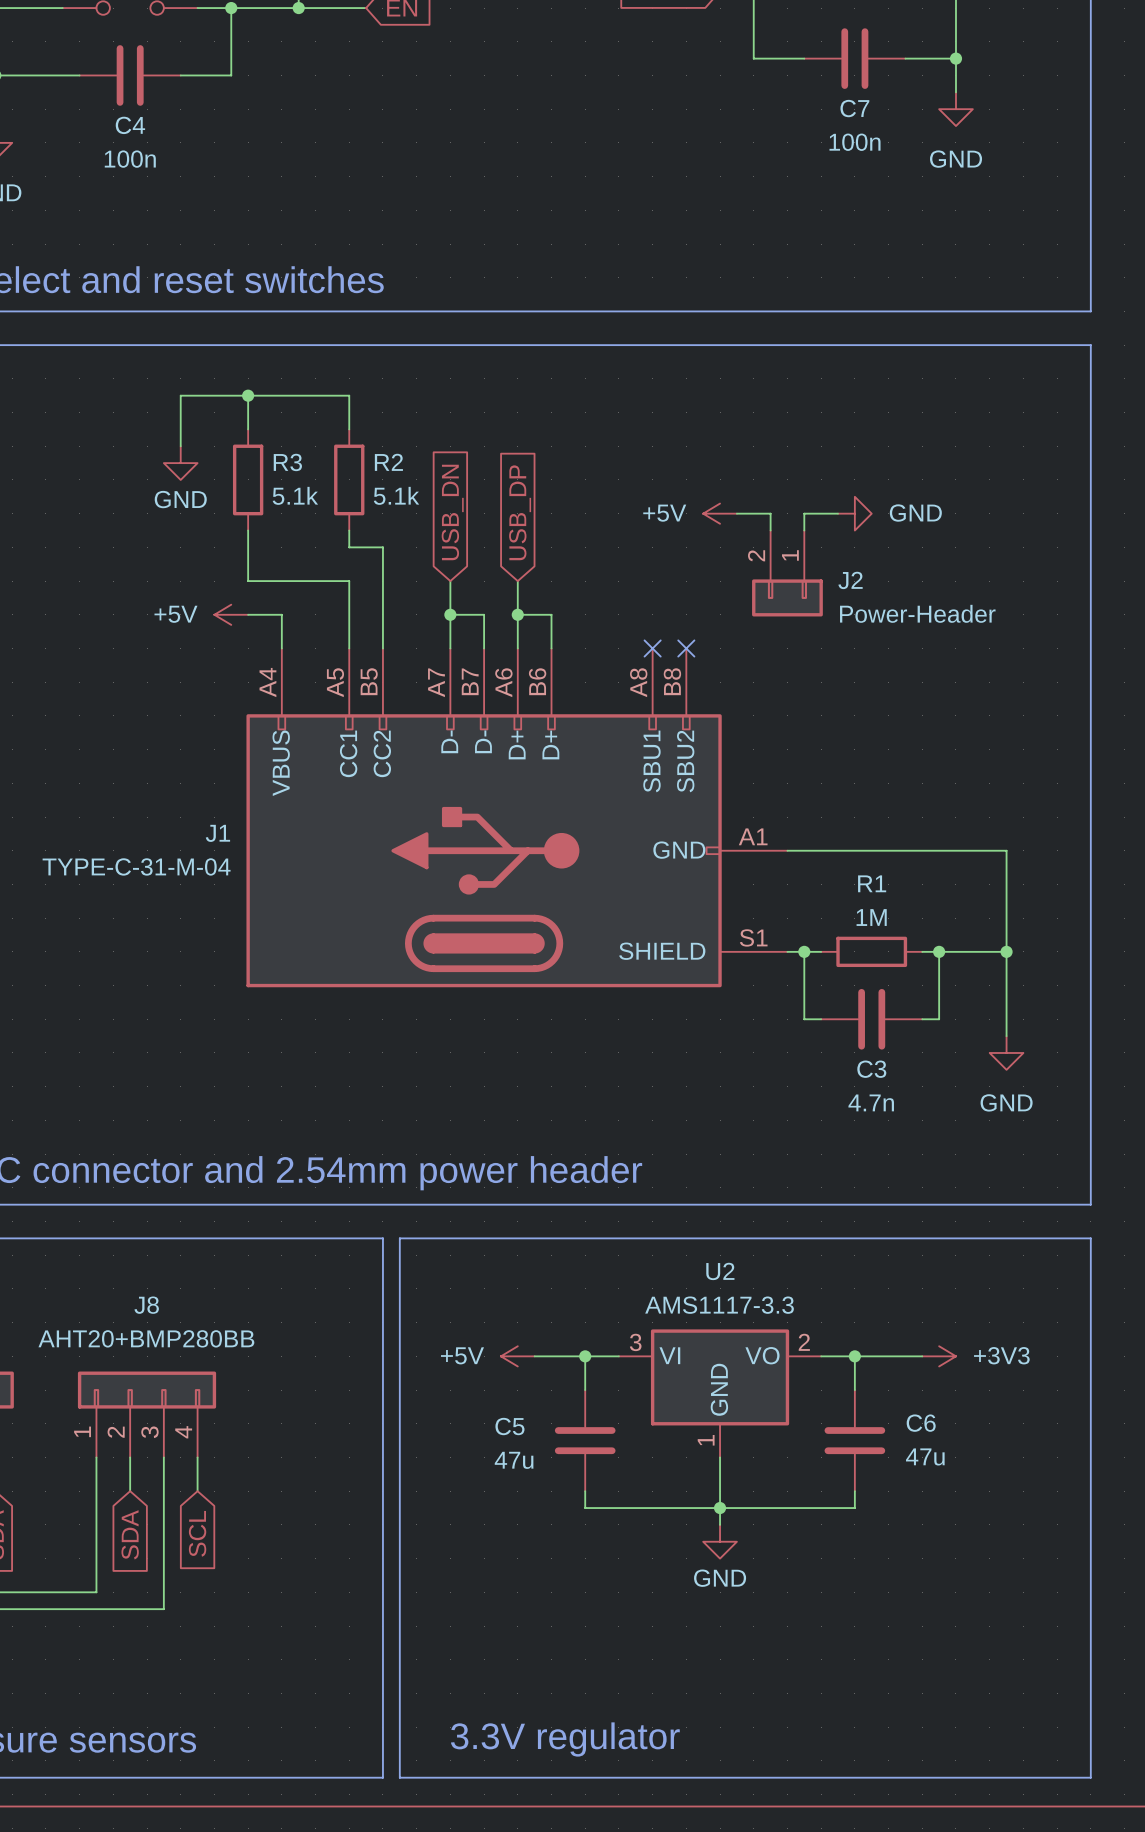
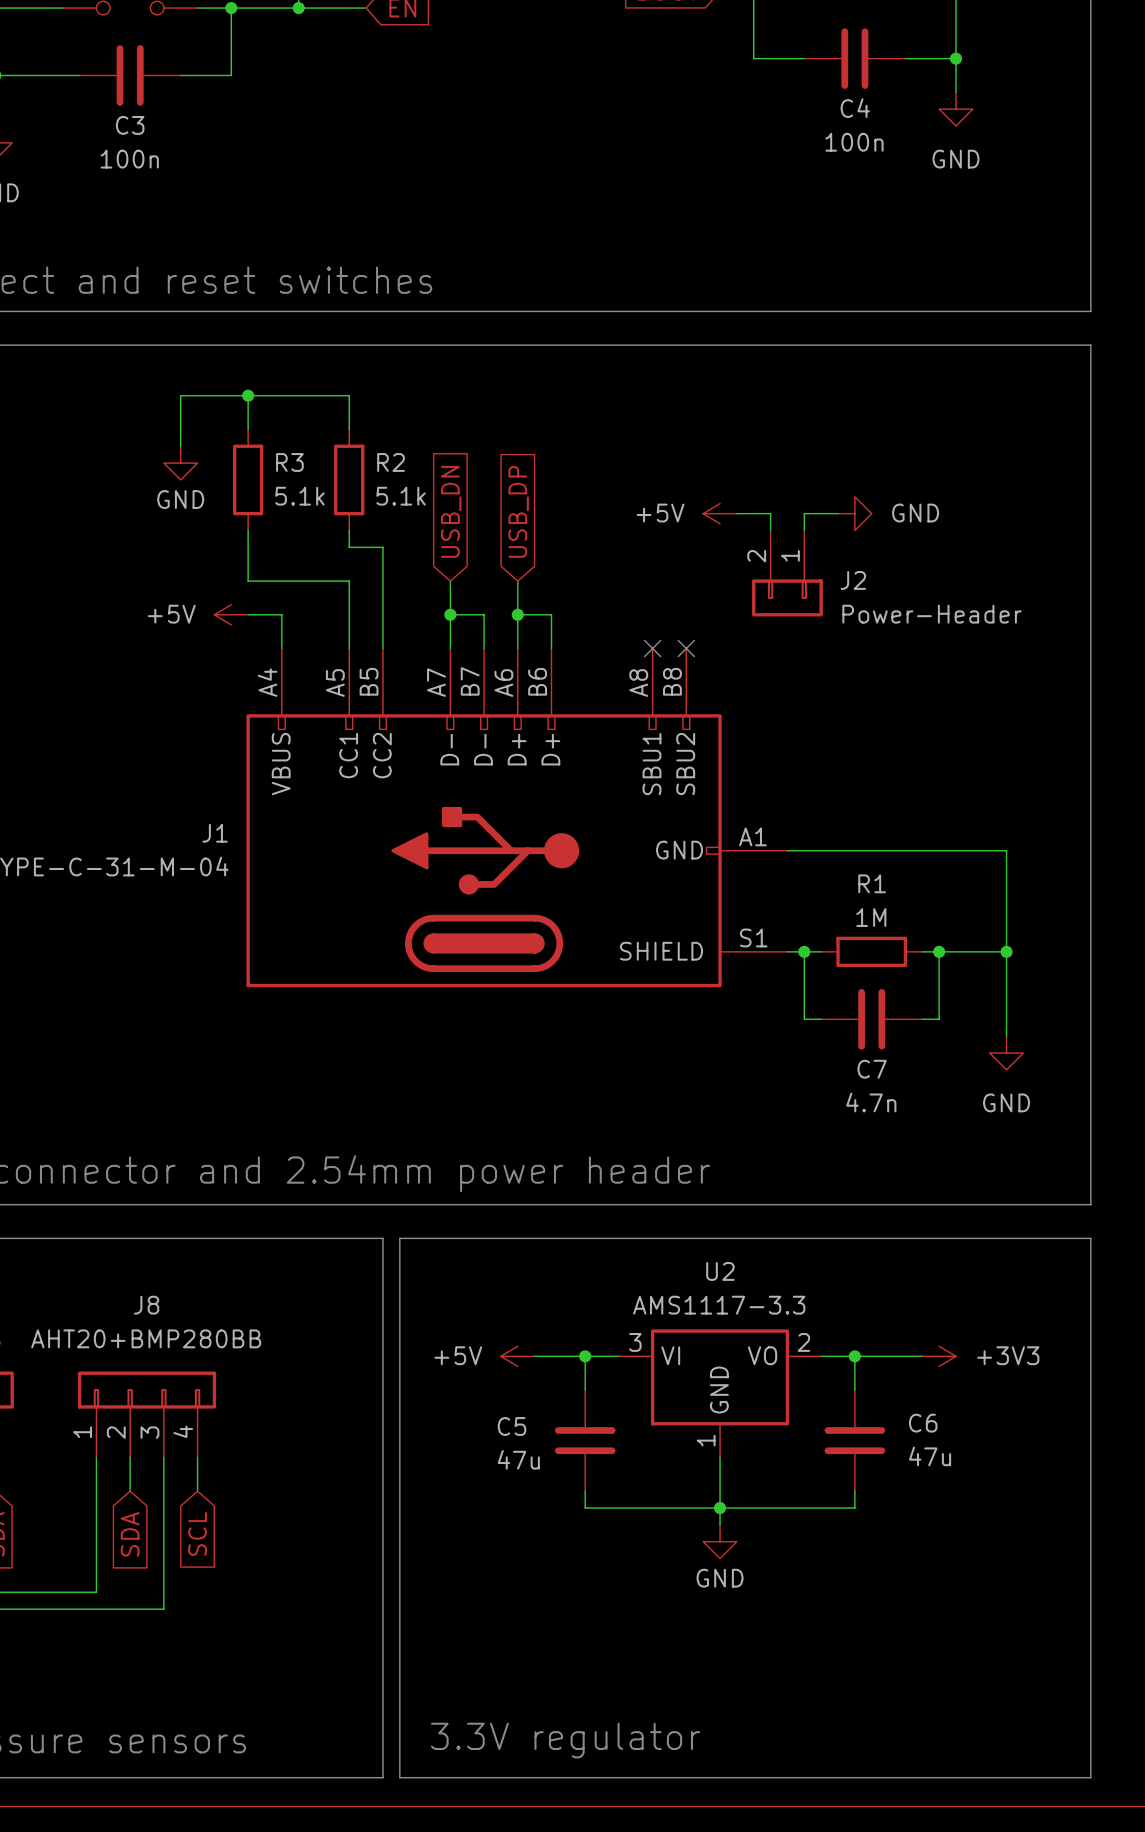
C7 name: C7 (854, 108) -> C4 (855, 108)
C4 name: C4 (130, 125) -> C3 (130, 125)
C3 name: C3 (871, 1069) -> C7 (872, 1069)

